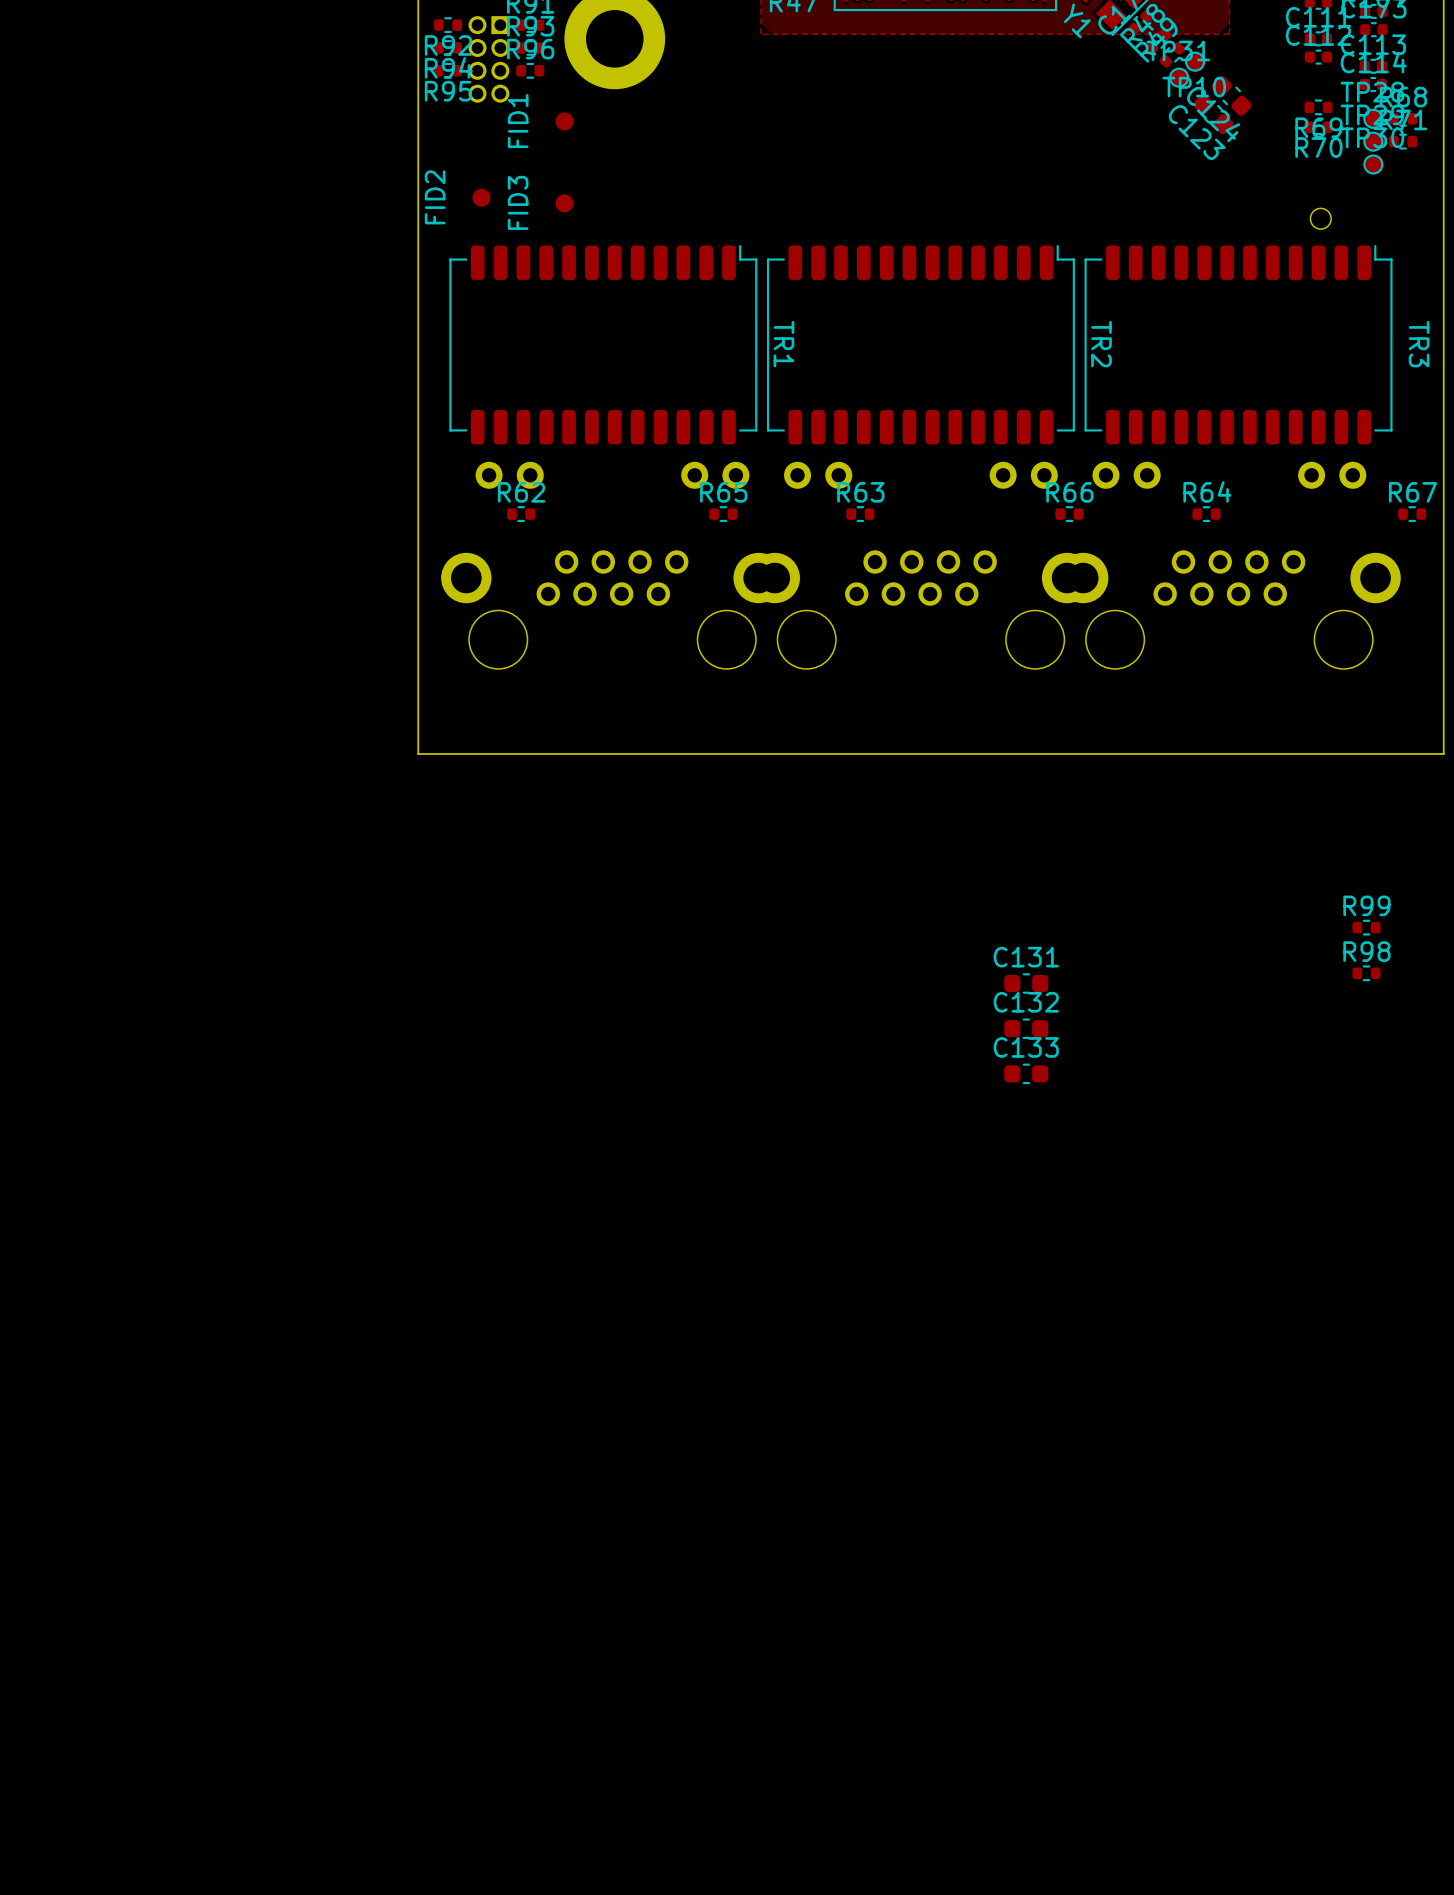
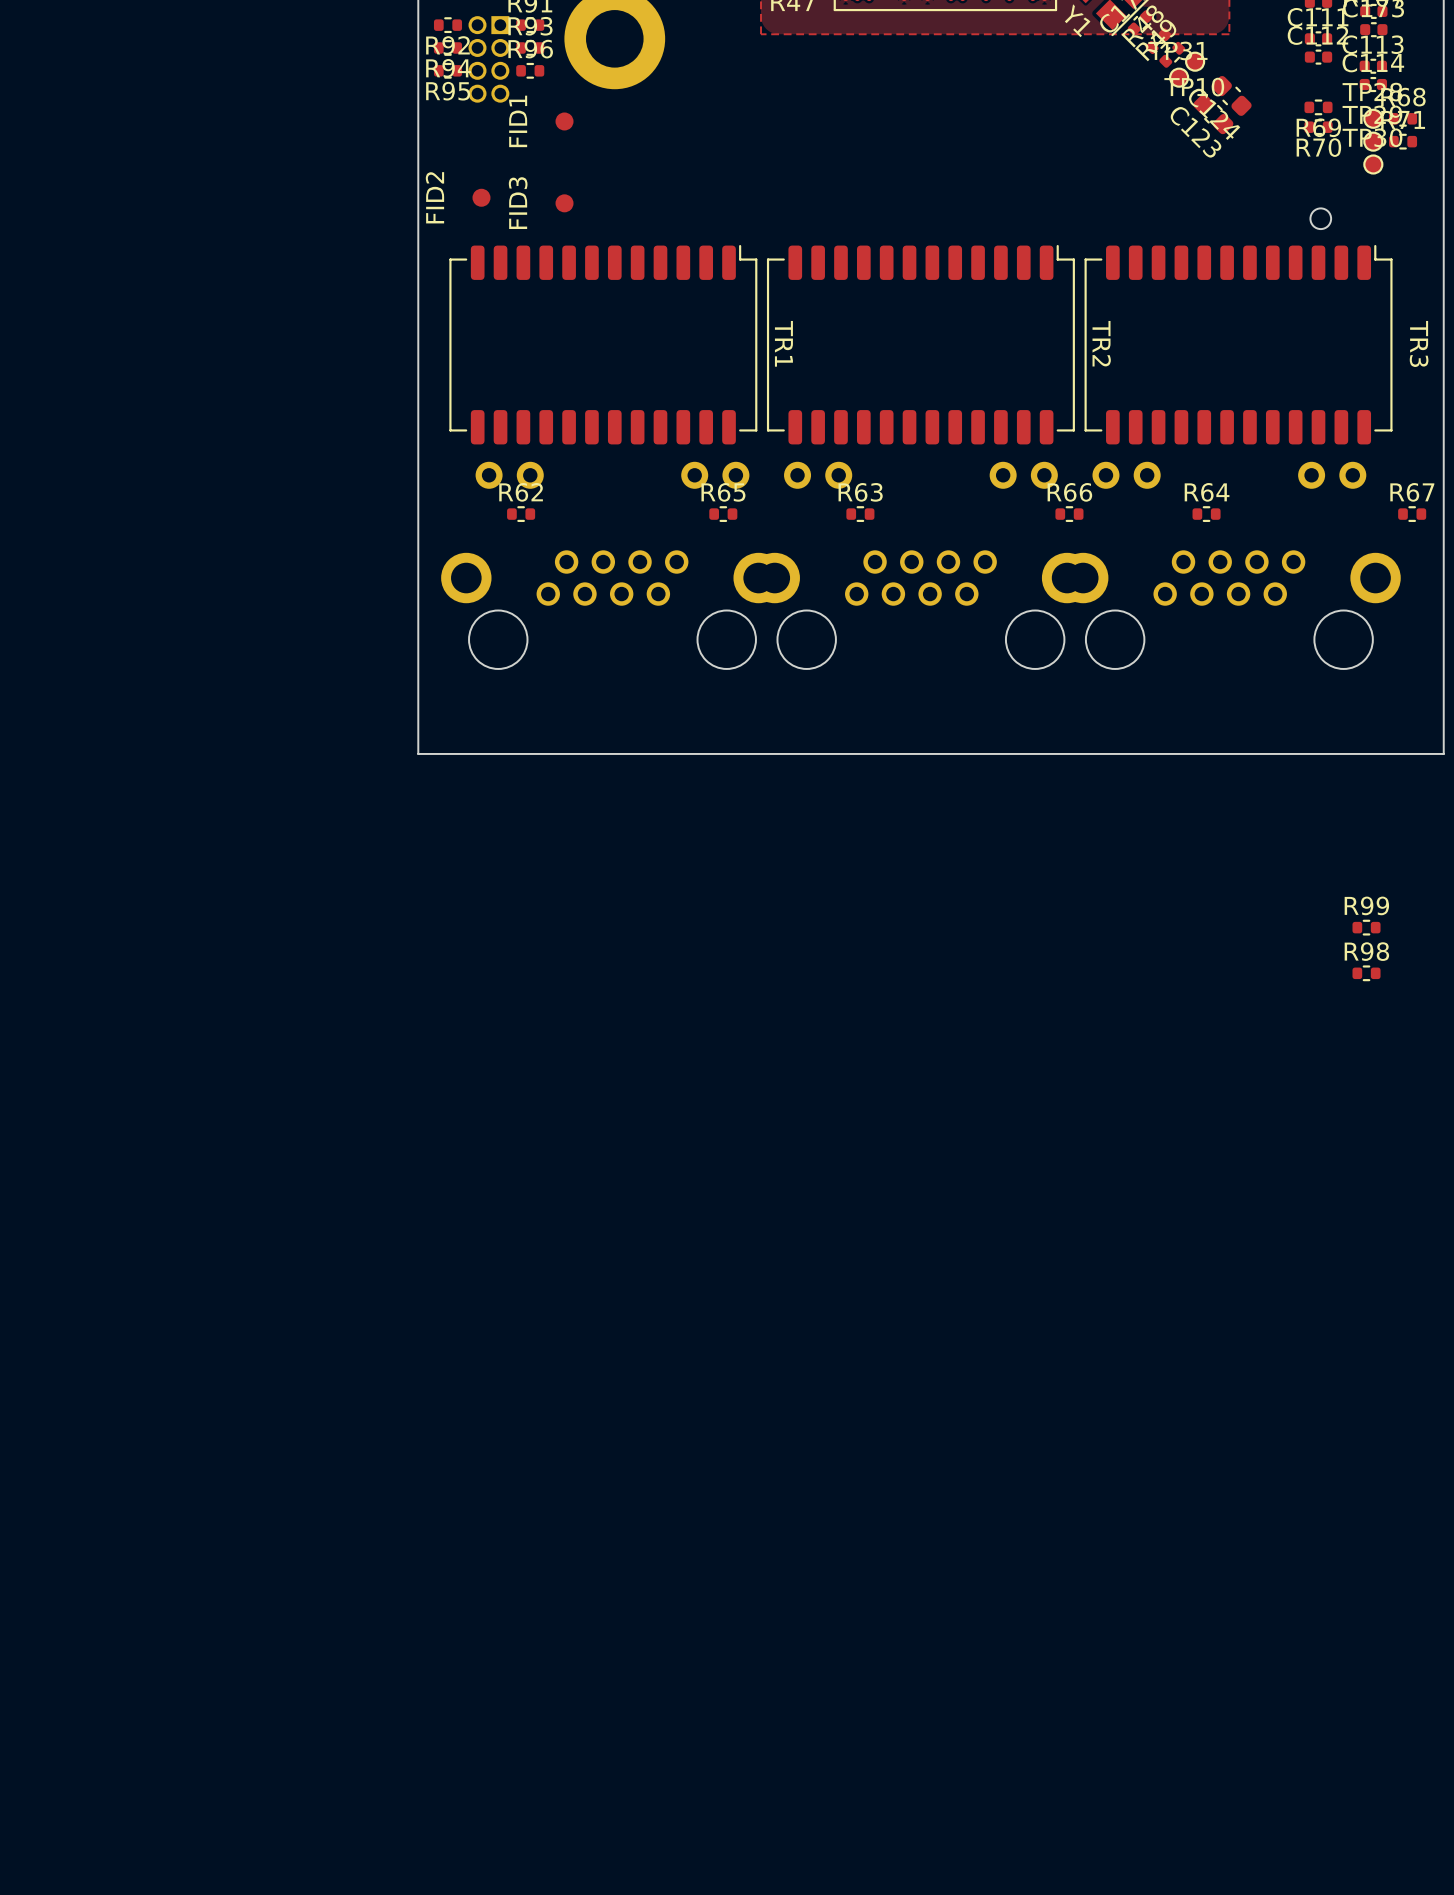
C131: (1026, 983) -> none
C132: (1026, 1028) -> none
C133: (1026, 1073) -> none

